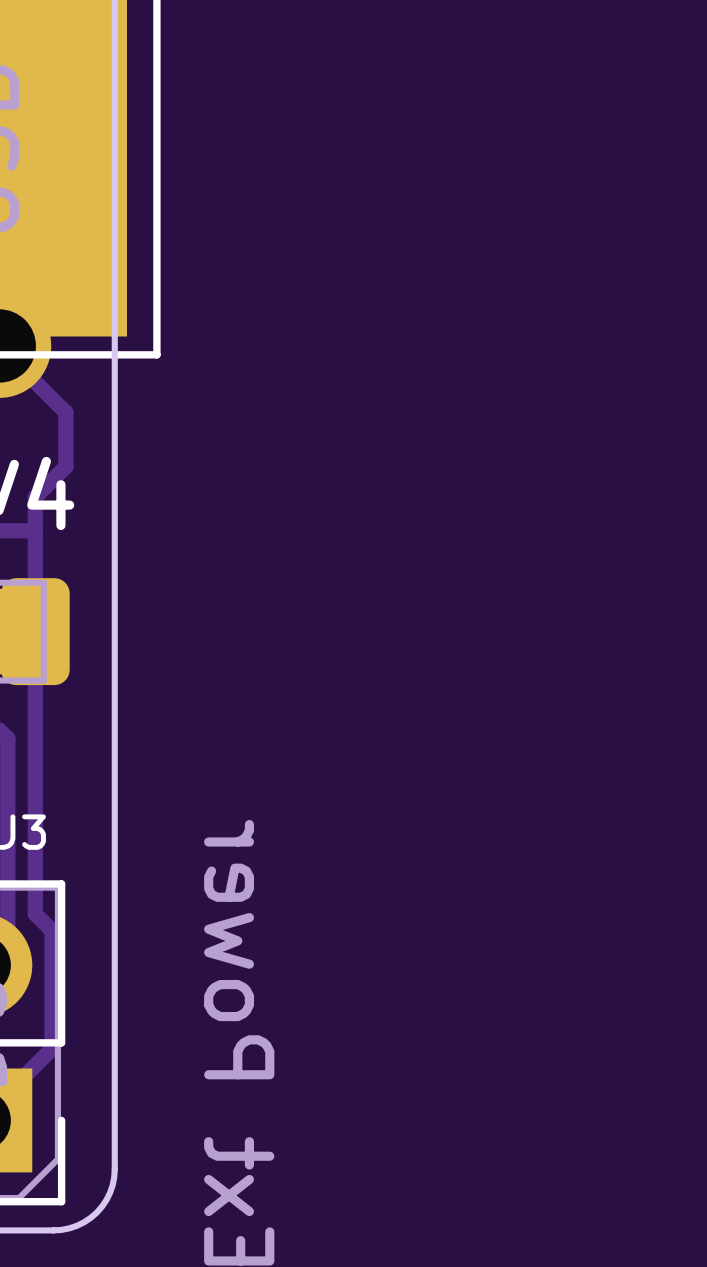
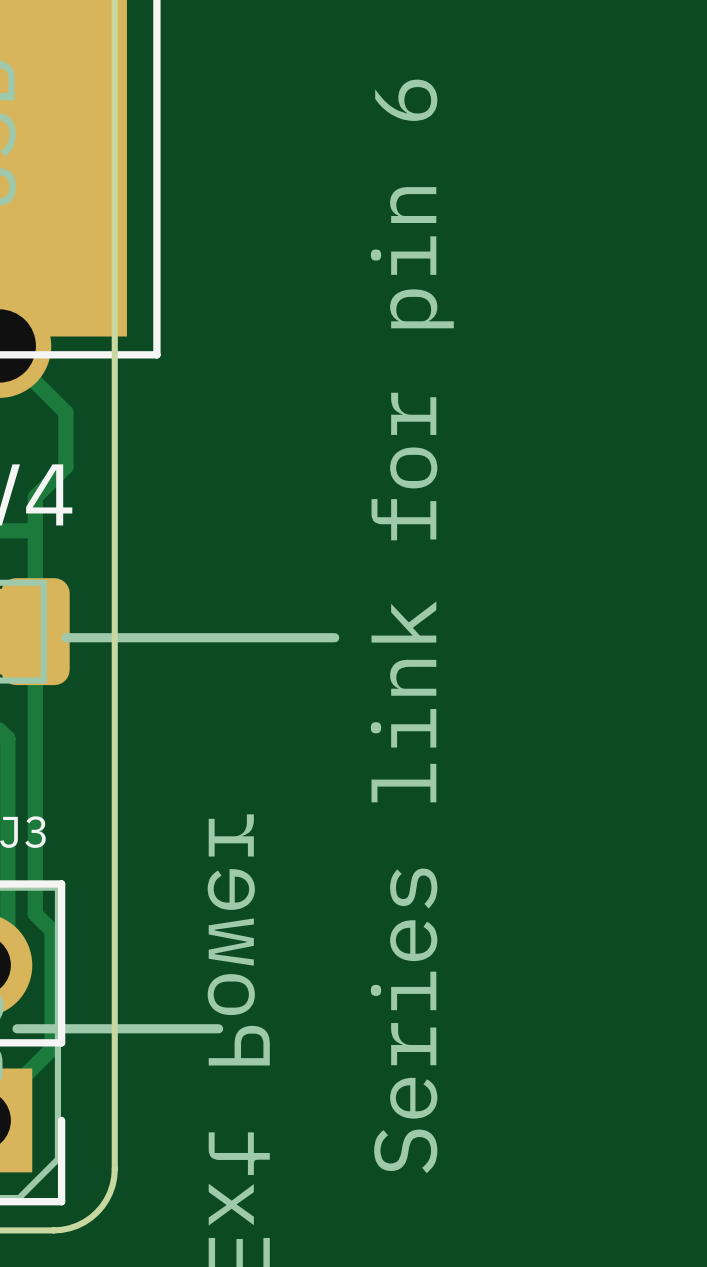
text: none -> Series link for pin 6 (412, 626)
line: none -> (65, 637) (334, 637)
line: none -> (16, 1028) (218, 1028)

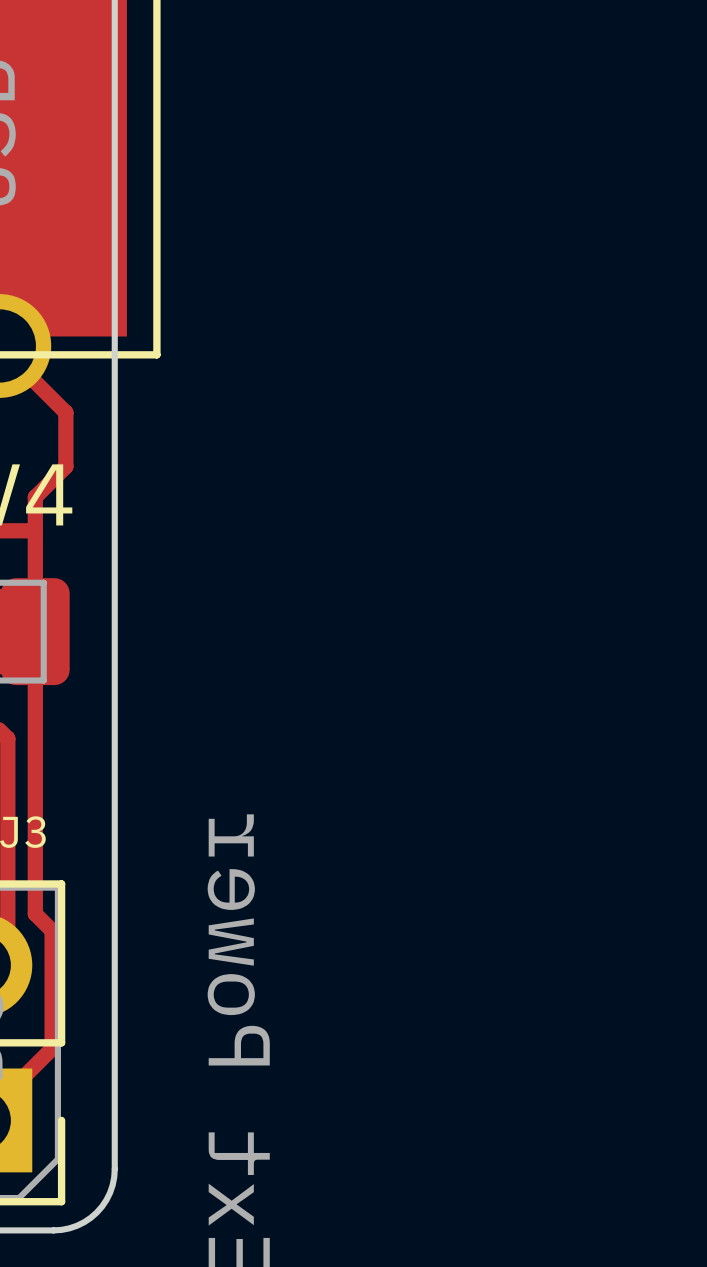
text: Series link for pin 6 (412, 626) -> none
line: (65, 637) (334, 637) -> none
line: (16, 1028) (218, 1028) -> none

